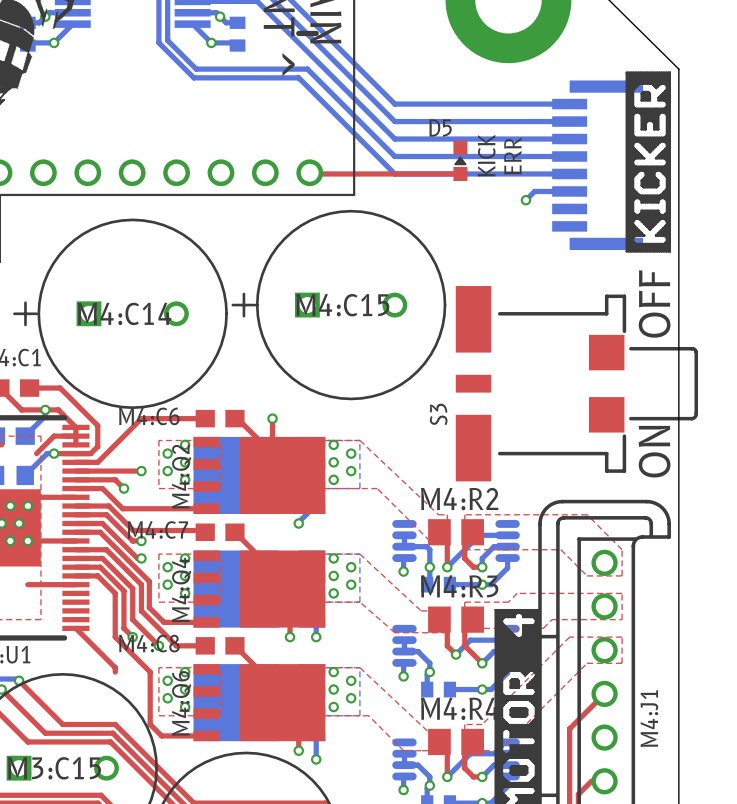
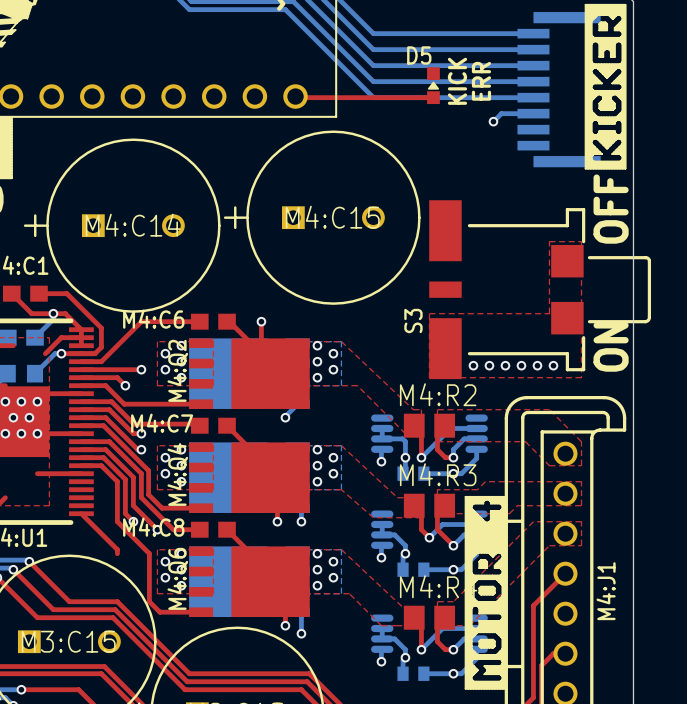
top zone outline: none -> (549, 241) (549, 313) (429, 313) (429, 377) (581, 377) (581, 241) (549, 241)
via: none -> (473, 365)
via: none -> (489, 365)
via: none -> (505, 365)
via: none -> (521, 365)
via: none -> (537, 365)
via: none -> (553, 365)

